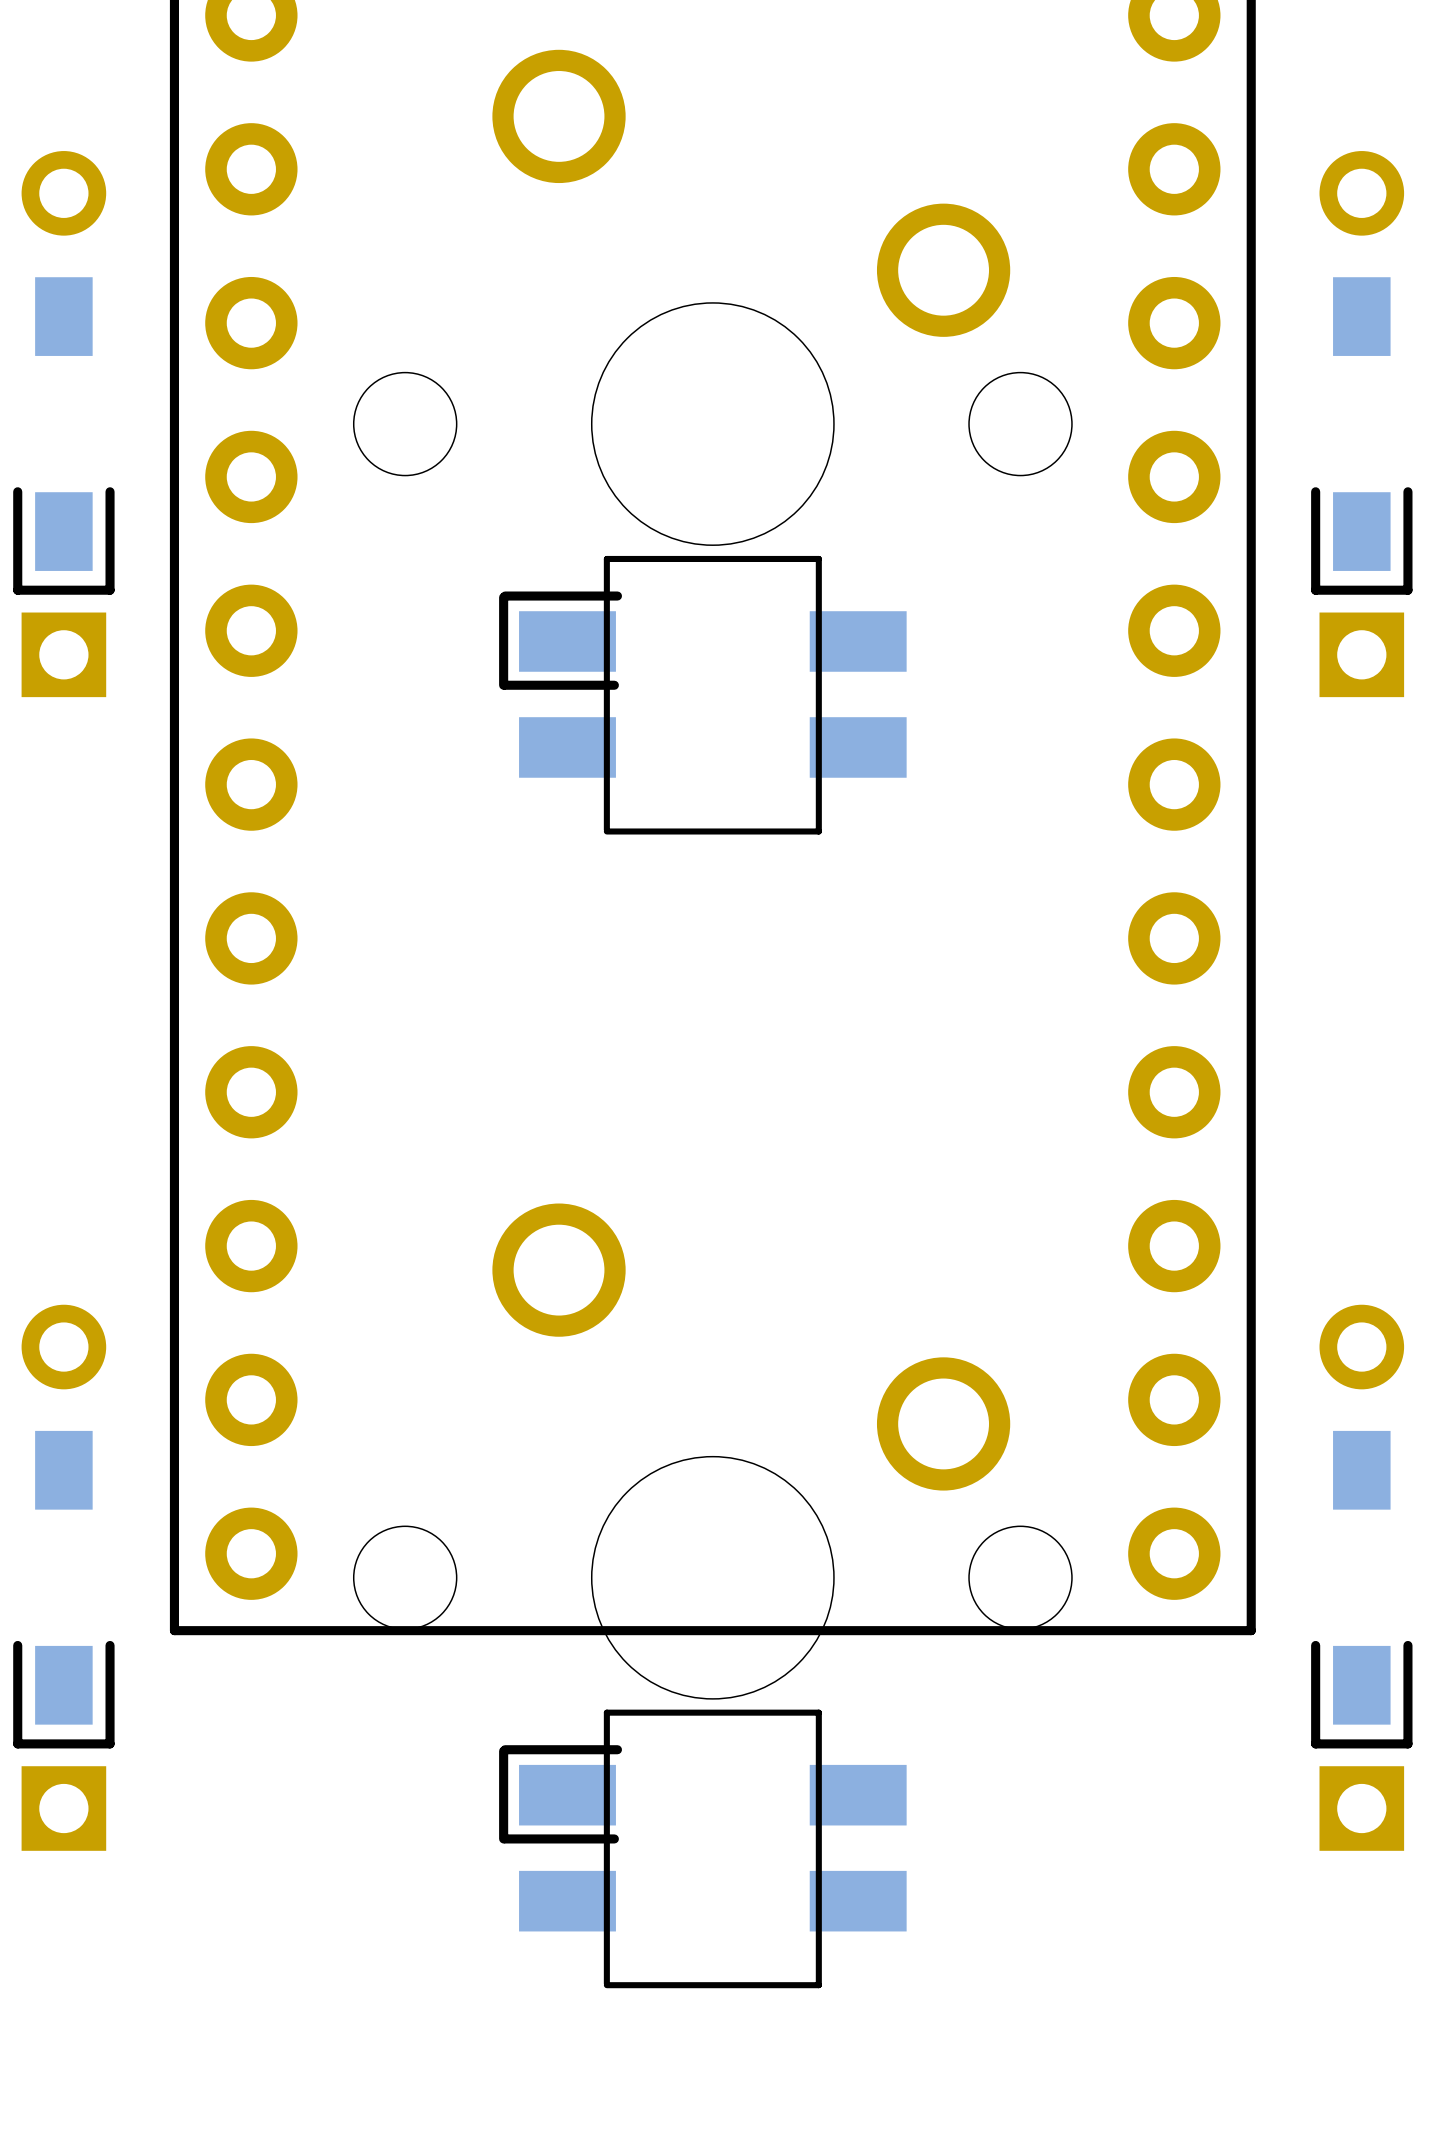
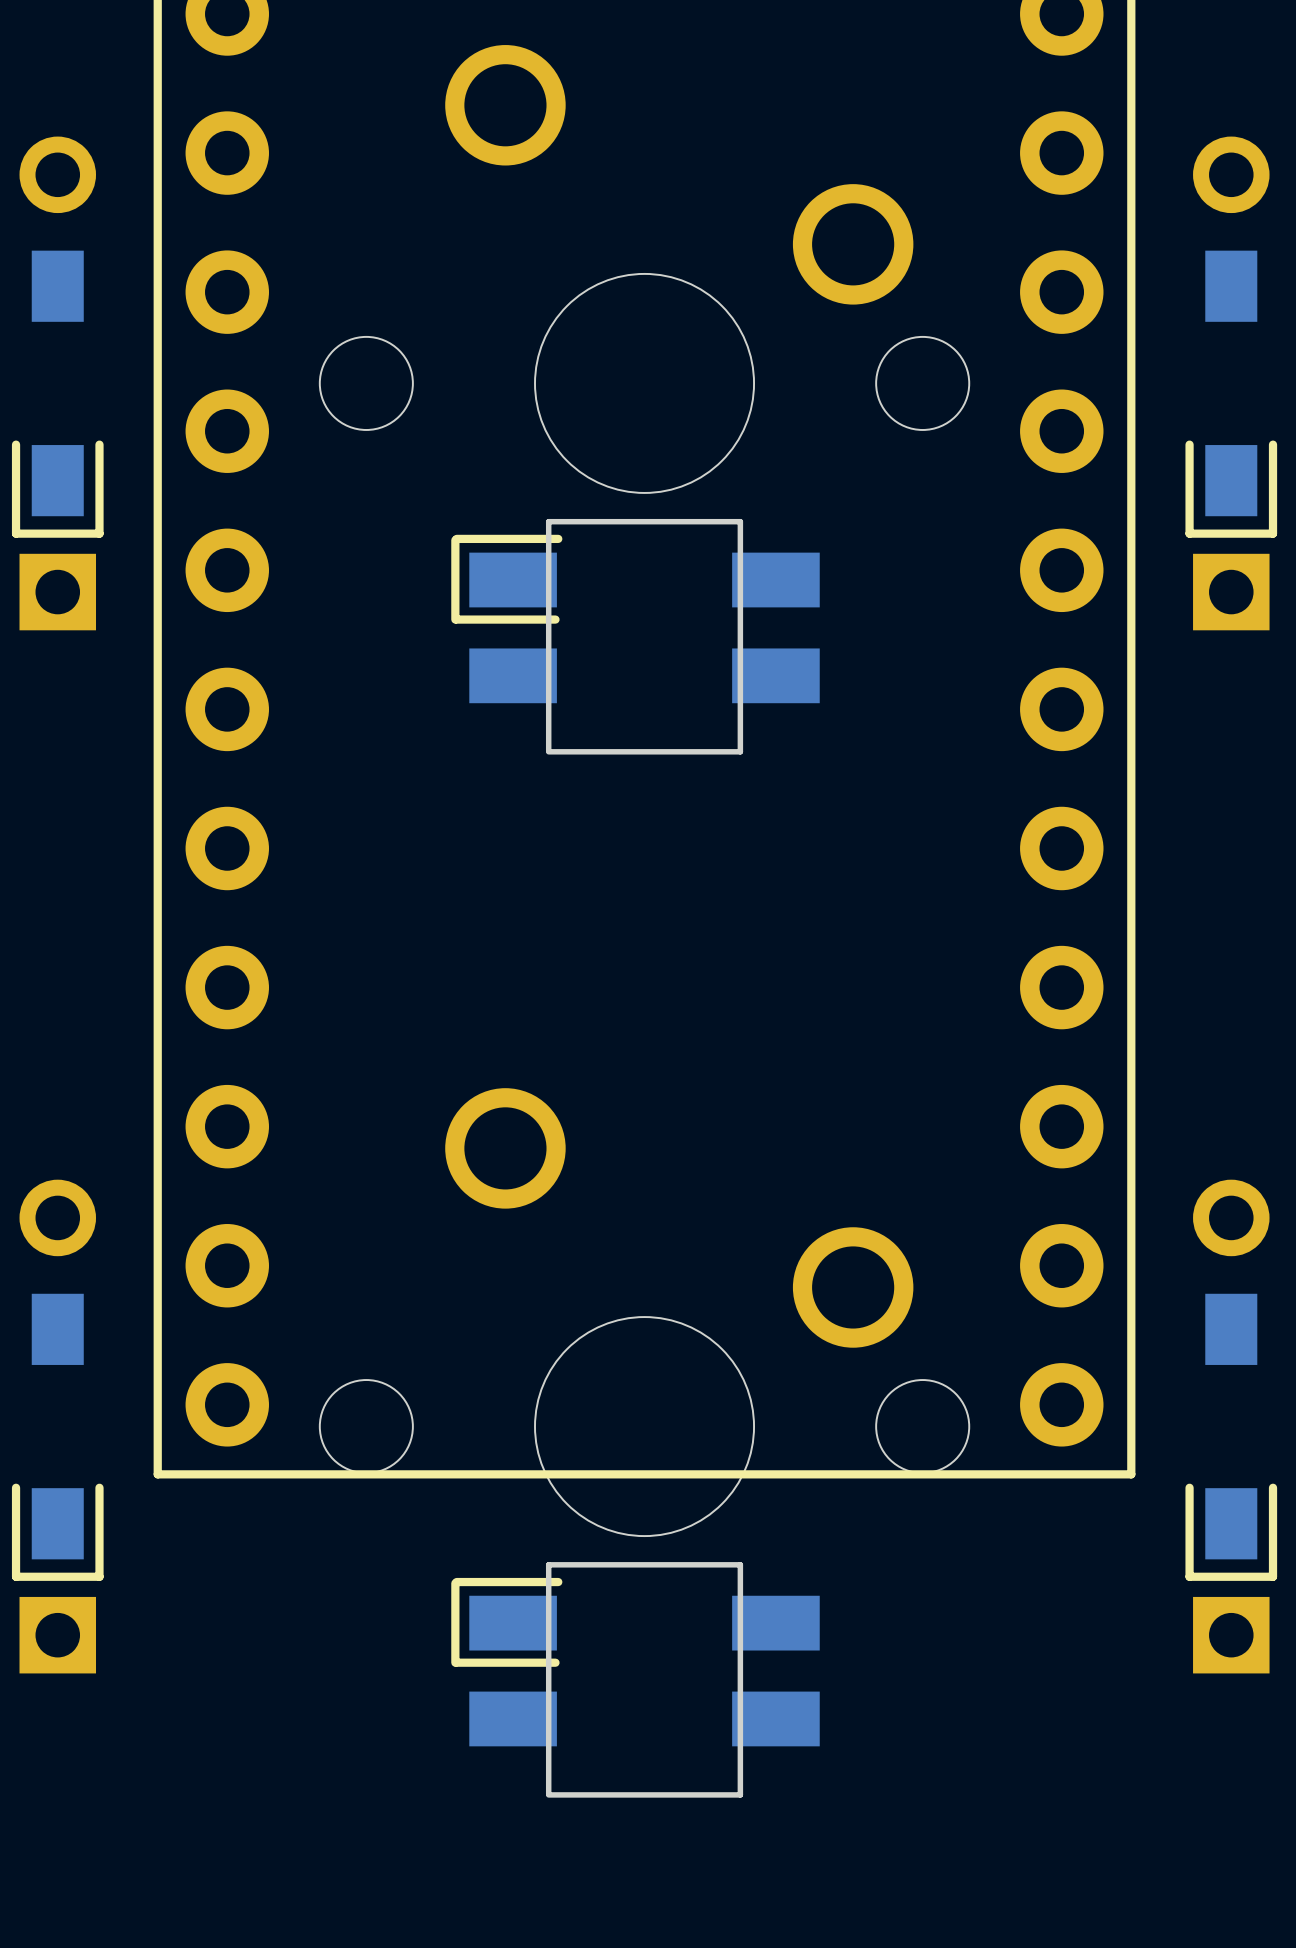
board edge: (818, 576) (818, 558) (606, 558) (606, 576) -> (740, 521) (548, 521)
board edge: (818, 1730) (818, 1712) (606, 1712) (606, 1730) -> (740, 1564) (548, 1564)

